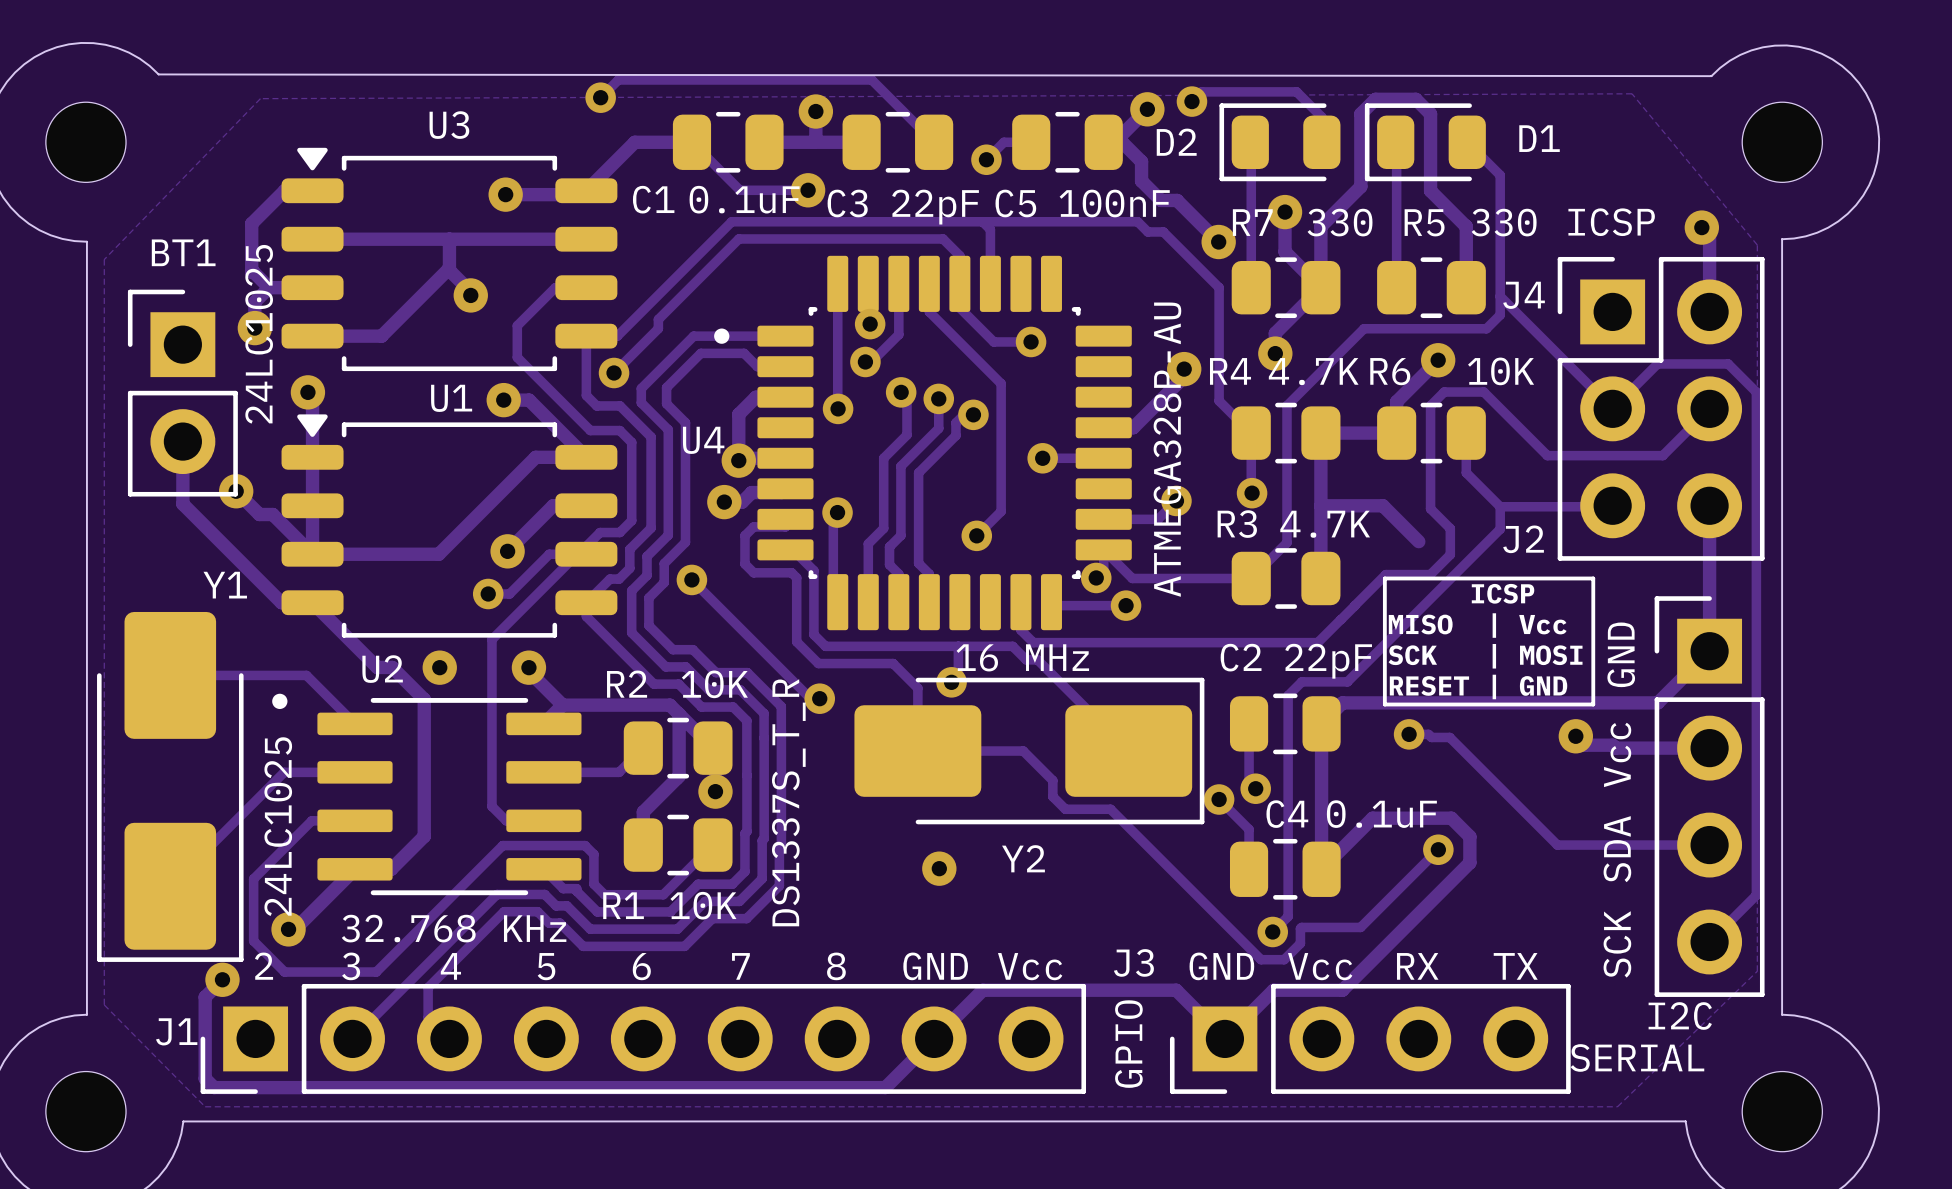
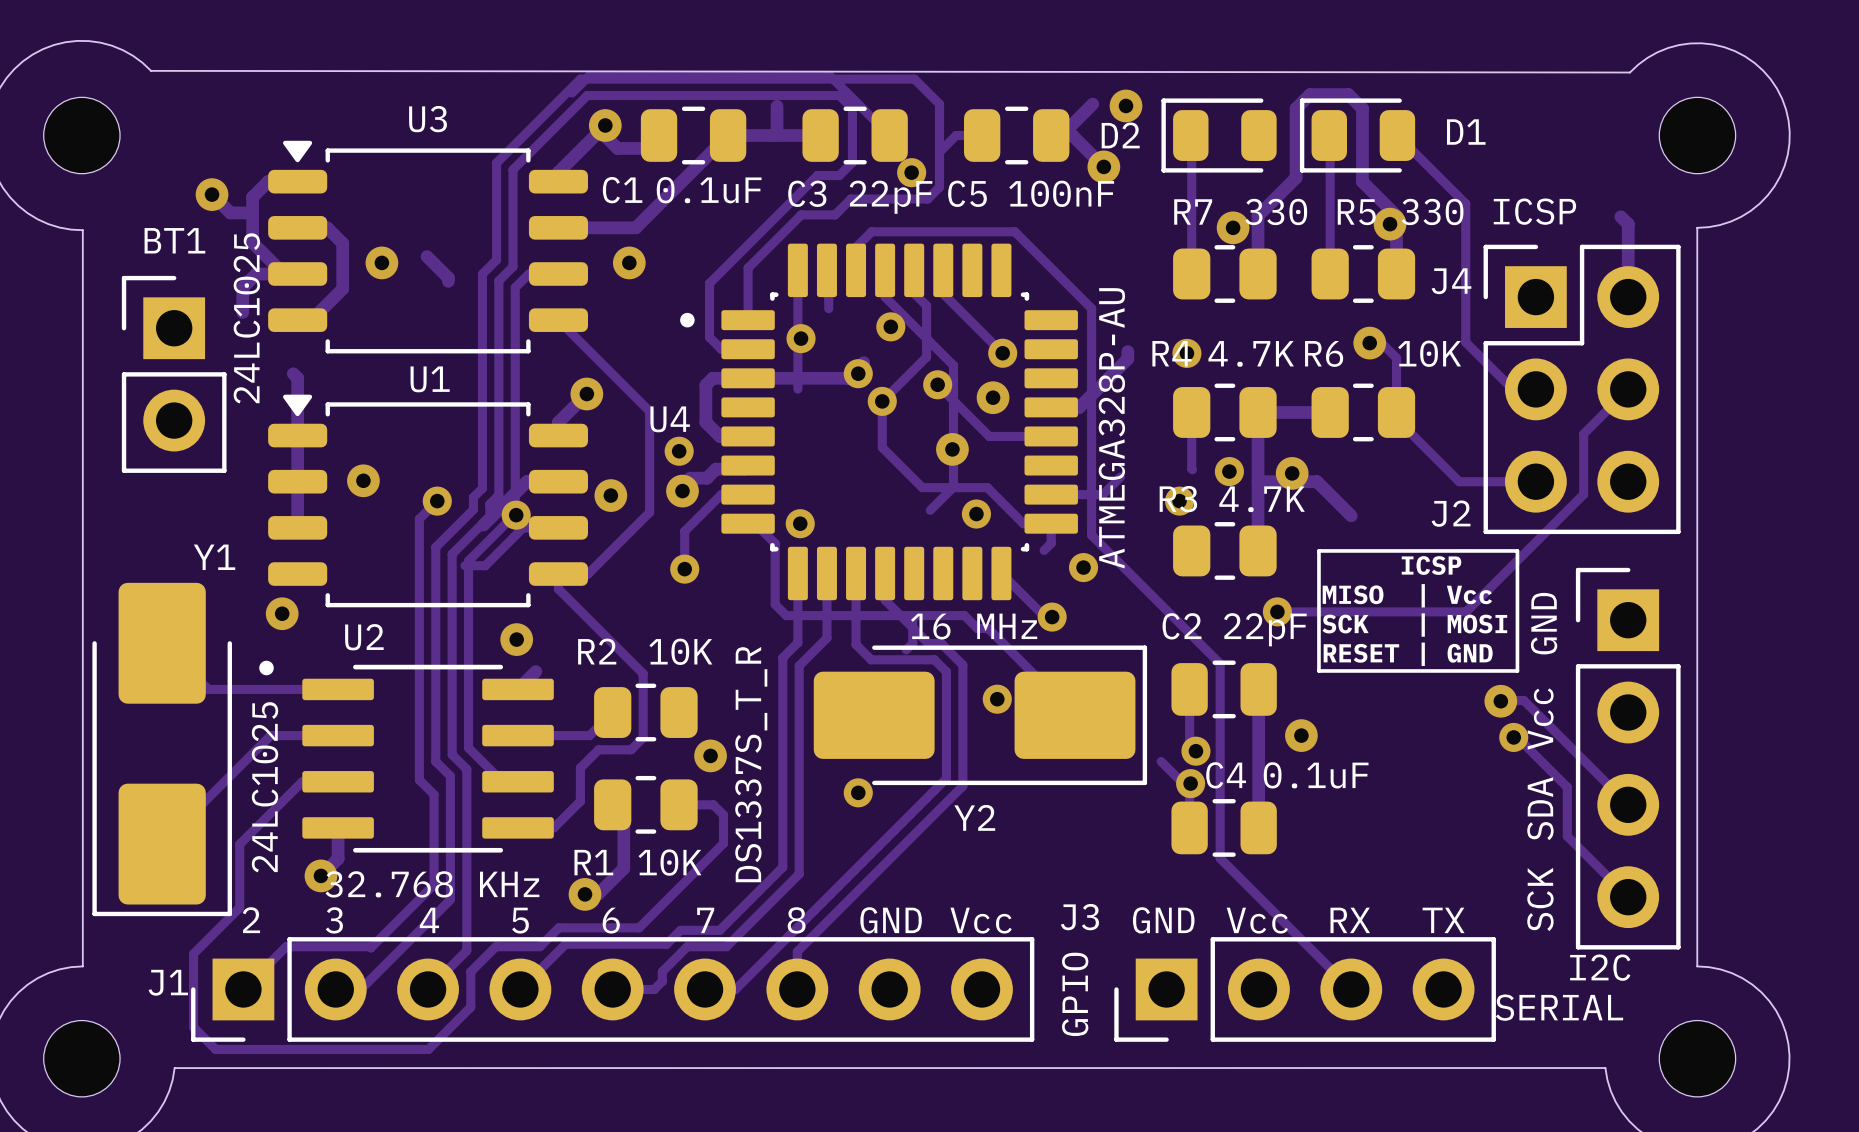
zone outline: (1632, 93) (1757, 245) (1757, 971) (1617, 1106) (205, 1106) (104, 1004) (104, 259) (260, 98) (1632, 93) -> none
via: (600, 97) -> none
track: (1191, 101) (1201, 91) (1296, 91) (1321, 117) (1321, 123) -> none
via position: (1191, 101) -> (1126, 105)
via: (1147, 109) -> none
via: (815, 111) -> none
track: none -> (605, 125) (558, 172) (558, 181) (570, 181)
via: none -> (605, 125)
track: none -> (604, 126) (604, 135) (617, 148) (646, 148) (659, 135)
track: (1122, 142) (1141, 161) (1141, 181) (1160, 200) (1177, 200) (1218, 242) -> (1068, 135) (1072, 135) (1103, 166)
via position: (986, 159) -> (911, 172)
via: none -> (1103, 166)
track: (1500, 175) (1500, 315) (1486, 328) (1364, 328) (1286, 405) (1286, 542) (1251, 578) (1132, 578) (1103, 549) -> (1428, 166) (1465, 203) (1465, 342) (1512, 389) (1535, 389)
track: (284, 190) (251, 223) (251, 272) (269, 287) -> (271, 181) (268, 181) (252, 197) (252, 242) (283, 273)
track: (808, 190) (739, 190) (691, 142) (634, 142) (582, 194) (505, 194) -> none
via: (808, 190) -> none
via: (505, 194) -> none
track: none -> (212, 194) (230, 212) (252, 212)
via: none -> (212, 194)
track: (1285, 212) (1285, 251) (1320, 287) (1275, 333) (1275, 353) -> none
via position: (1285, 212) -> (1233, 227)
track: (982, 221) (990, 229) (990, 283) -> (1002, 353) (943, 293) (943, 270)
via: (1701, 227) -> none
via: none -> (1390, 224)
track: (343, 239) (586, 239) -> (728, 135) (635, 227) (558, 227)
track: (449, 239) (449, 268) (381, 336) (327, 336) -> (327, 227) (342, 243) (342, 288) (311, 320)
via: (1218, 242) -> none
via: none -> (381, 262)
via: none -> (629, 262)
track: (898, 283) (898, 334) (871, 361) (865, 361) -> (856, 270) (856, 247) (871, 231) (1014, 231) (1091, 308) (1091, 535) (1220, 663) (1220, 858) (1351, 989)
track: (959, 283) (959, 255) (943, 238) (738, 238) (658, 319) (658, 328) (614, 372) -> none
via: (470, 295) -> none
track: (1500, 296) (1612, 408) (1657, 363) (1728, 363) (1756, 392) (1756, 895) (1709, 941) -> (1513, 737) (1517, 737) (1567, 787) (1567, 836) (1628, 897)
track: (541, 302) (517, 325) (517, 357) (590, 430) (619, 430) (631, 442) (631, 520) (619, 532) (600, 532) (586, 546) (586, 554) -> (515, 287) (515, 514) (468, 560) (468, 609)
track: (972, 321) (993, 341) (1031, 341) -> (926, 305) (926, 357) (882, 401) (882, 447) (922, 487) (987, 487) (1023, 523) (1051, 523)
via: (870, 324) -> none
via: (254, 328) -> none
track: (785, 336) (693, 336) (641, 388) (641, 402) (668, 429) (668, 535) (647, 556) (647, 575) (631, 590) (631, 632) (665, 666) (685, 666) (708, 689) (740, 689) (764, 713) (764, 738) -> none
via position: (1031, 341) -> (1002, 353)
via: none -> (890, 326)
track: none -> (1373, 334) (1396, 358) (1396, 412)
via position: (1275, 353) -> (1186, 353)
track: (744, 354) (700, 353) (666, 387) (666, 403) (685, 422) (685, 542) (664, 563) (664, 582) (648, 597) (648, 625) (672, 649) (692, 649) (715, 672) (747, 672) (781, 706) (781, 845) (779, 847) (779, 885) (746, 918) (712, 918) (684, 946) (583, 946) (559, 923) (549, 923) (537, 911) (504, 911) (428, 987) (428, 1017) (449, 1038) (449, 1016) -> (709, 337) (709, 283) (817, 175) (839, 175) (852, 162) (852, 108) (839, 95) (587, 95) (513, 169) (513, 266) (498, 280) (498, 495) (489, 504) (489, 516) (452, 554) (452, 754) (466, 769) (466, 950) (428, 989)
track: (1438, 360) (1396, 401) (1396, 433) -> none
via position: (865, 361) -> (801, 338)
via: (1184, 369) -> none
via: (614, 372) -> none
track: none -> (863, 362) (848, 378) (748, 378)
via: (307, 392) -> none
track: (901, 392) (906, 398) (906, 435) (883, 458) (883, 528) (868, 543) (868, 602) -> (612, 989) (654, 989) (662, 981) (662, 971) (687, 946) (726, 946) (799, 874) (799, 665) (826, 638) (826, 573)
track: (755, 397) (738, 414) (738, 460) (741, 458) (755, 458) -> (719, 378) (712, 378) (705, 385) (705, 422) (719, 436)
track: (938, 398) (938, 428) (900, 466) (900, 535) (889, 546) (889, 564) (898, 574) (898, 602) -> (705, 989) (735, 989) (946, 778) (946, 671) (934, 659) (871, 659) (856, 644) (856, 573)
via position: (938, 398) -> (882, 401)
track: (503, 400) (529, 400) (586, 457) (535, 457) (438, 554) (312, 554) (272, 514) (259, 514) (236, 491) -> none
via: (503, 400) -> none
track: none -> (937, 384) (989, 436) (993, 436)
via: (838, 408) -> none
track: none -> (586, 394) (558, 422) (558, 435)
via: none -> (586, 394)
track: (973, 414) (964, 414) (955, 422) (955, 435) (918, 472) (918, 563) (929, 574) (929, 602) -> (797, 989) (797, 951) (962, 786) (962, 665) (941, 643) (928, 643) (885, 600) (885, 573)
via position: (973, 414) -> (937, 384)
via: none -> (993, 397)
track: (1251, 433) (1219, 400) (1219, 287) (1163, 231) (1147, 231) (1137, 221) (731, 221) (617, 336) (586, 336) (586, 395) (596, 405) (620, 405) (651, 436) (651, 528) (629, 549) (629, 568) (619, 579) (609, 579) (586, 602) -> (558, 320) (649, 411) (649, 512) (587, 574) (558, 574)
track: (1466, 439) (1466, 472) (1500, 506) -> none
track: (182, 441) (182, 504) (281, 602) (312, 602) (377, 667) (392, 667) (424, 699) (424, 836) (391, 869) (355, 869) (294, 929) (288, 929) -> none
track: (1662, 455) (1547, 455) (1483, 392) (1444, 392) (1430, 405) (1430, 508) (1450, 528) (1450, 554) (1430, 574) (1385, 574) (1317, 642) (1033, 642) (1020, 630) (1020, 602) -> (1583, 433) (1583, 494) (1466, 611) (1277, 611)
via: (1042, 458) -> none
via position: (738, 460) -> (679, 451)
via: none -> (952, 449)
via: (236, 491) -> none
via: (1252, 493) -> none
via: none -> (1229, 471)
via: none -> (1292, 473)
via: (1176, 500) -> none
via position: (724, 502) -> (682, 491)
via: none -> (363, 480)
track: (1612, 505) (1500, 506) -> (1535, 481) (1459, 481) (1396, 418)
track: (1698, 505) (1709, 505) (1709, 651) (1657, 702) (1342, 702) (1321, 723) -> none
track: (1500, 506) (1500, 529) (1347, 681) (1301, 681) (1288, 695) (1288, 916) (1272, 931) -> none
track: (837, 512) (833, 516) (833, 597) (837, 602) -> (520, 989) (565, 944) (666, 944) (680, 930) (719, 930) (782, 867) (782, 657) (797, 642) (797, 573)
via position: (837, 512) -> (800, 523)
track: (785, 519) (785, 526) (753, 526) (744, 535) (744, 564) (753, 572) (791, 572) (796, 577) (796, 641) (818, 663) (893, 663) (917, 688) (917, 751) (1023, 751) (1052, 780) (1052, 796) (1065, 809) (1110, 809) (1261, 959) (1284, 959) (1300, 943) (1301, 927) (1360, 927) (1438, 849) -> (748, 494) (721, 494) (684, 531) (684, 569)
via: none -> (610, 495)
track: none -> (437, 501) (419, 519) (419, 780) (434, 794) (434, 884) (370, 947) (286, 946) (243, 989)
via: none -> (437, 501)
via: none -> (1179, 501)
via: (976, 535) -> none
via: none -> (976, 514)
via: none -> (516, 515)
via: (507, 551) -> none
track: (577, 554) (491, 639) -> none
via: (1096, 577) -> none
track: (691, 579) (810, 698) (819, 698) -> none
via position: (691, 579) -> (684, 569)
via: (488, 594) -> none
track: (1054, 605) (1126, 605) -> (1004, 576) (1045, 617) (1052, 617)
via position: (1126, 605) -> (1083, 567)
track: (586, 616) (653, 684) (678, 684) (701, 707) (733, 707) (746, 720) (746, 775) -> (558, 587) (643, 673) (643, 737) (631, 749) (598, 749) (580, 767) (580, 801) (553, 827) (518, 827)
via: none -> (1277, 611)
via: none -> (282, 613)
via: none -> (1052, 617)
via: (439, 667) -> none
track: (528, 667) (528, 671) (562, 705) (670, 705) (715, 750) (715, 791) -> none
via position: (528, 667) -> (516, 639)
track: (170, 675) (306, 675) (355, 723) -> (162, 643) (208, 689) (338, 689)
via: (951, 682) -> none
via: (819, 698) -> none
track: (679, 714) (679, 776) (643, 812) (643, 845) -> (585, 894) (597, 894) (623, 868) (623, 815) (612, 804)
via: none -> (997, 699)
track: (1409, 734) (1449, 737) (1557, 845) (1709, 845) -> (1493, 700) (1523, 700) (1628, 804)
via: (1409, 734) -> none
track: (1575, 736) (1584, 745) (1612, 745) (1615, 748) (1709, 748) -> none
track: (764, 738) (762, 878) (739, 901) (705, 901) (677, 929) (590, 929) (567, 905) (556, 905) (544, 894) (496, 894) (352, 1038) -> (748, 320) (748, 268) (801, 214) (835, 214) (850, 199) (927, 199) (939, 187) (939, 104) (914, 79) (580, 79) (496, 162) (496, 259) (482, 274) (482, 488) (473, 497) (473, 509) (435, 547) (435, 761) (450, 776) (450, 899) (360, 989) (335, 989)
via: none -> (1301, 735)
via: none -> (1513, 737)
track: (746, 775) (744, 871) (732, 884) (698, 884) (670, 911) (597, 911) (576, 891) (576, 888) (563, 888) (543, 869) -> none
track: (491, 785) (491, 806) (506, 820) (527, 820) -> (468, 747) (502, 781)
via position: (715, 791) -> (710, 755)
via position: (1219, 799) -> (1190, 783)
track: (317, 820) (311, 820) (253, 878) (253, 941) (284, 972) (376, 972) (502, 845) (585, 845) (593, 854) (593, 884) (604, 894) (663, 894) (712, 845) -> (302, 781) (239, 844) (239, 907) (193, 953) (193, 1027) (215, 1049) (428, 1049) (470, 1007) (470, 971) (495, 946) (539, 946) (558, 927) (639, 927) (723, 843) (723, 814) (713, 804) (679, 804)
via: none -> (858, 792)
via: (1438, 849) -> none
via: (939, 868) -> none
track: none -> (338, 827) (338, 858) (320, 875)
track: (1321, 869) (1372, 818) (1451, 818) (1469, 836) (1469, 862) (1342, 990) (1273, 990) (1224, 1038) (1176, 990) (982, 990) (885, 1087) (214, 1087) (205, 1078) (205, 997) (222, 979) -> none
via position: (288, 929) -> (320, 875)
via: (1272, 931) -> none
via: none -> (585, 894)
via: (222, 979) -> none

